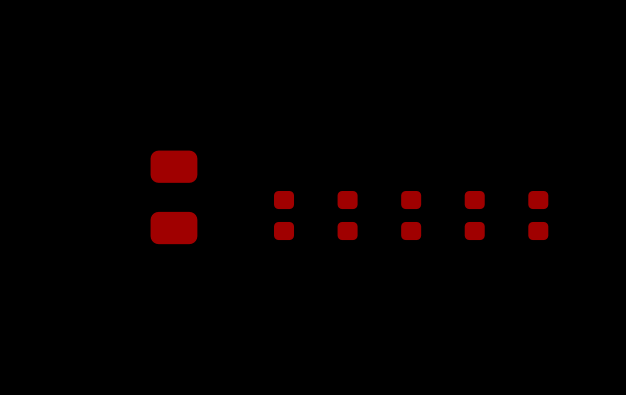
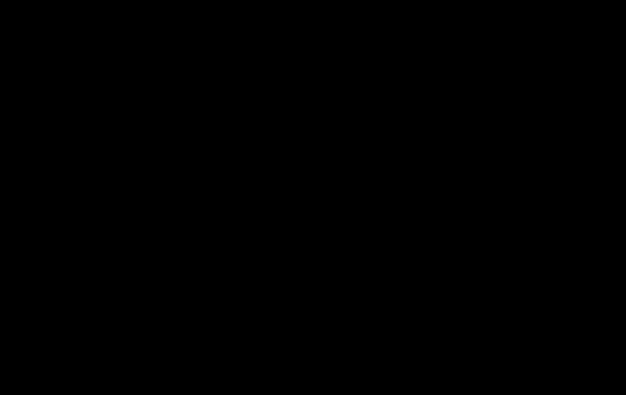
part: (173, 197) -> none
part: (284, 215) -> none
part: (347, 215) -> none
part: (411, 215) -> none
part: (474, 215) -> none
part: (538, 215) -> none

